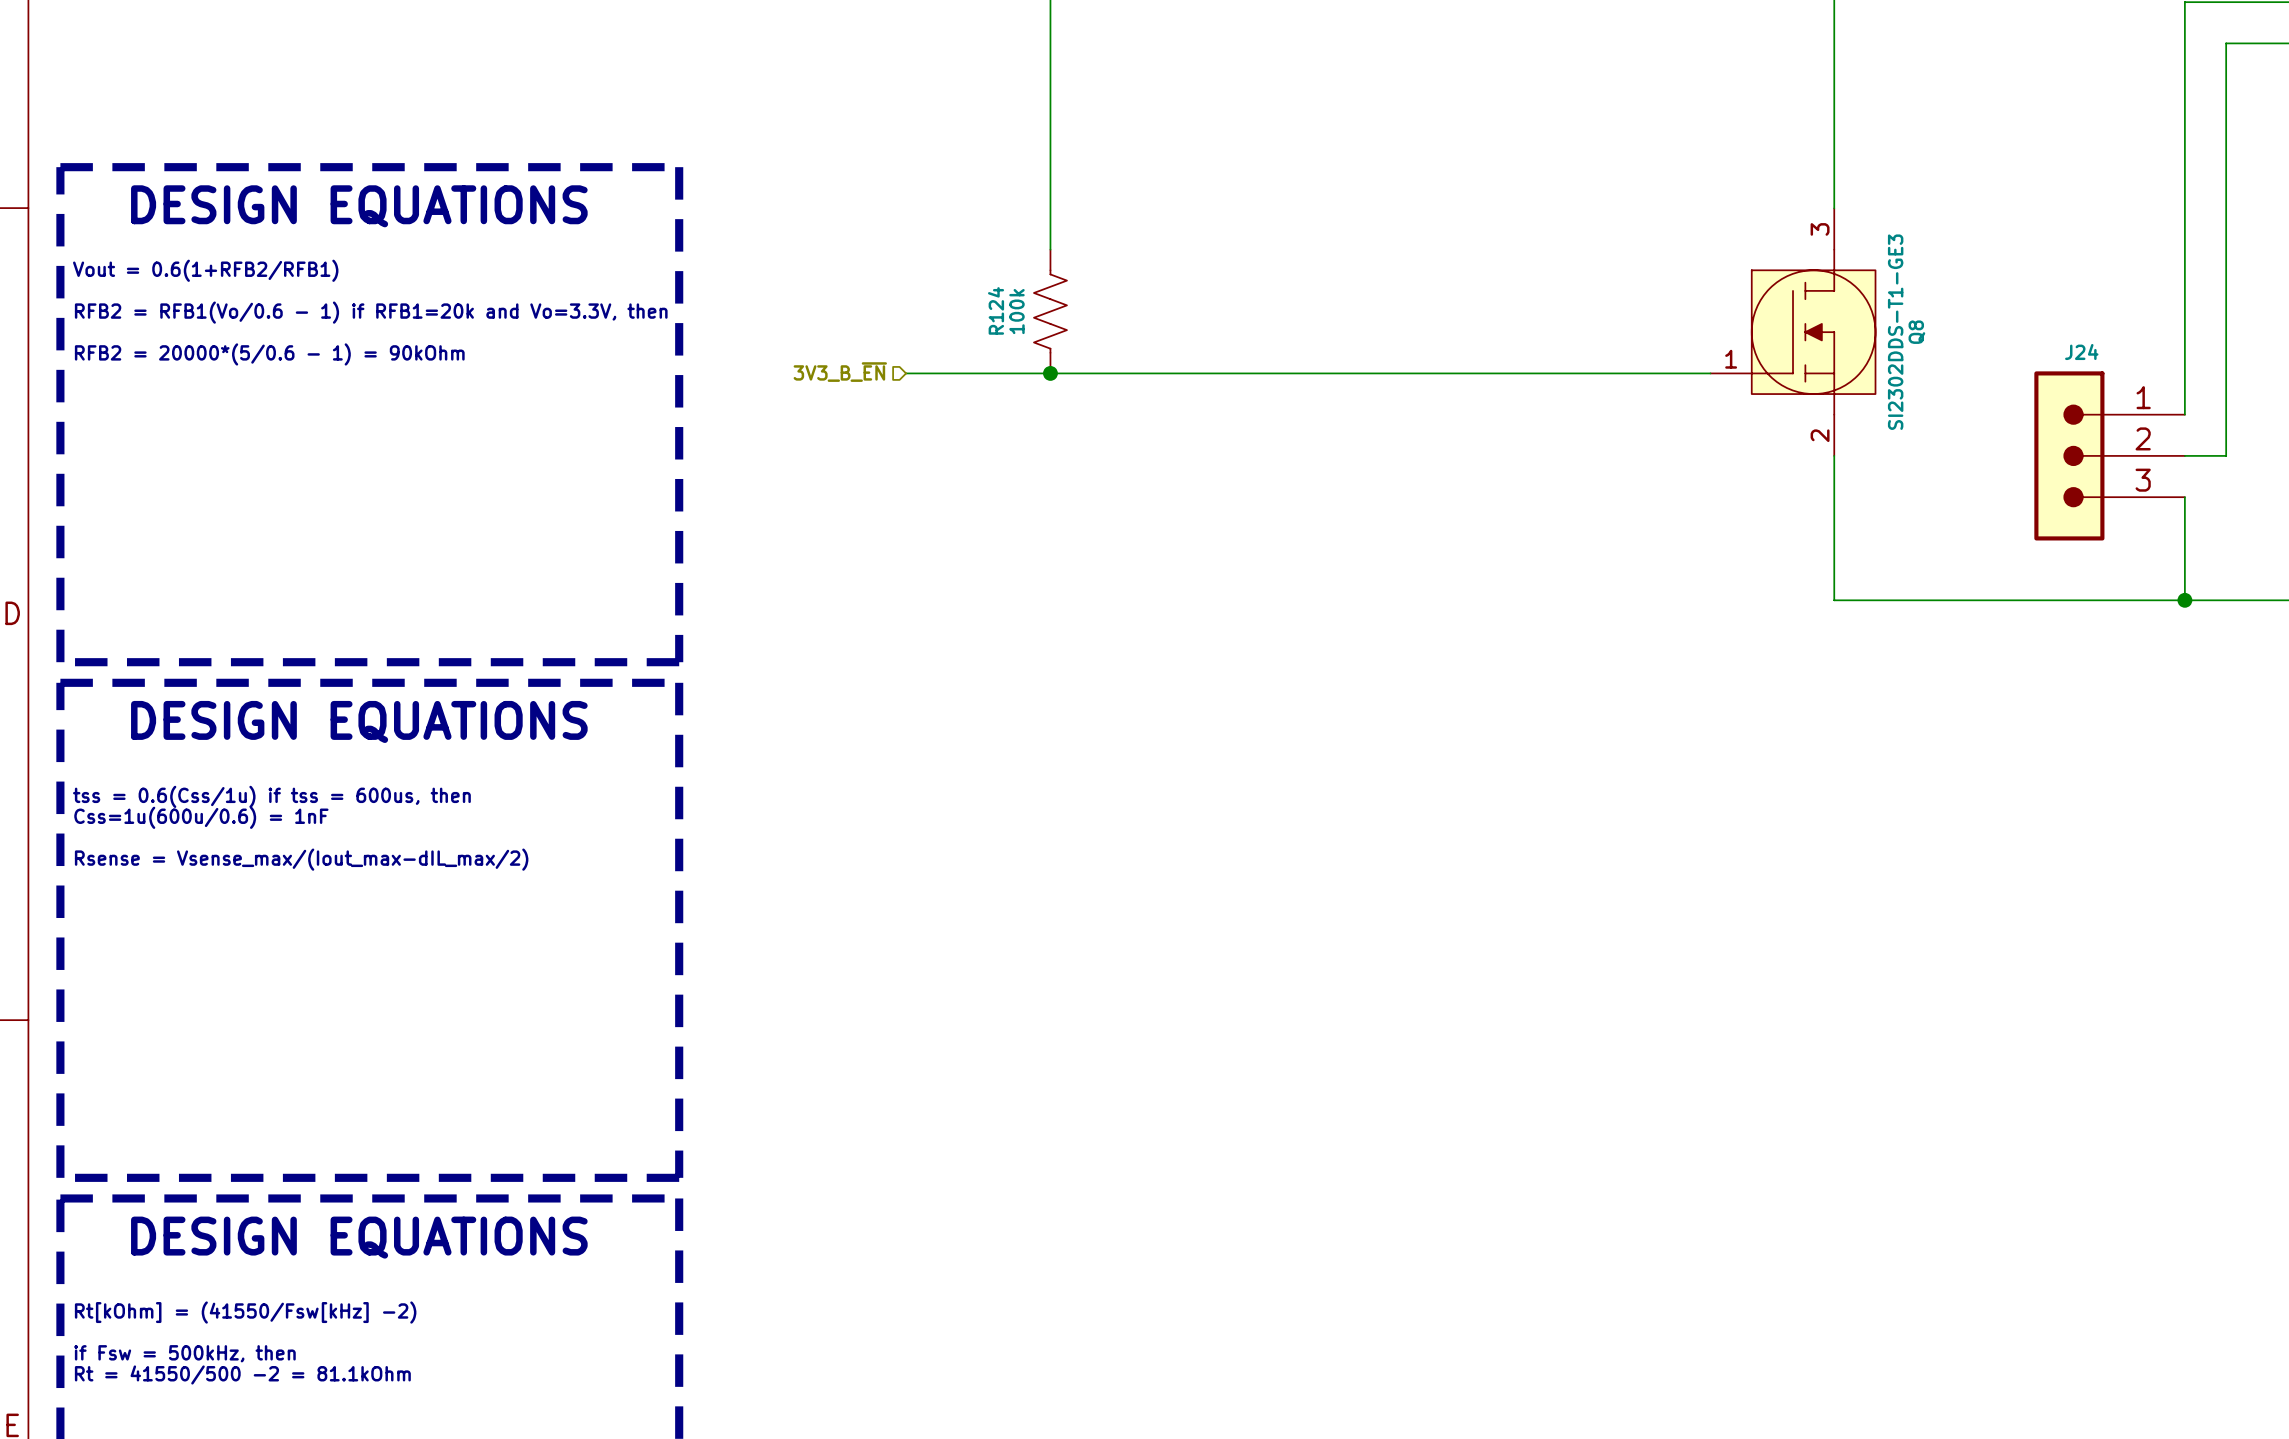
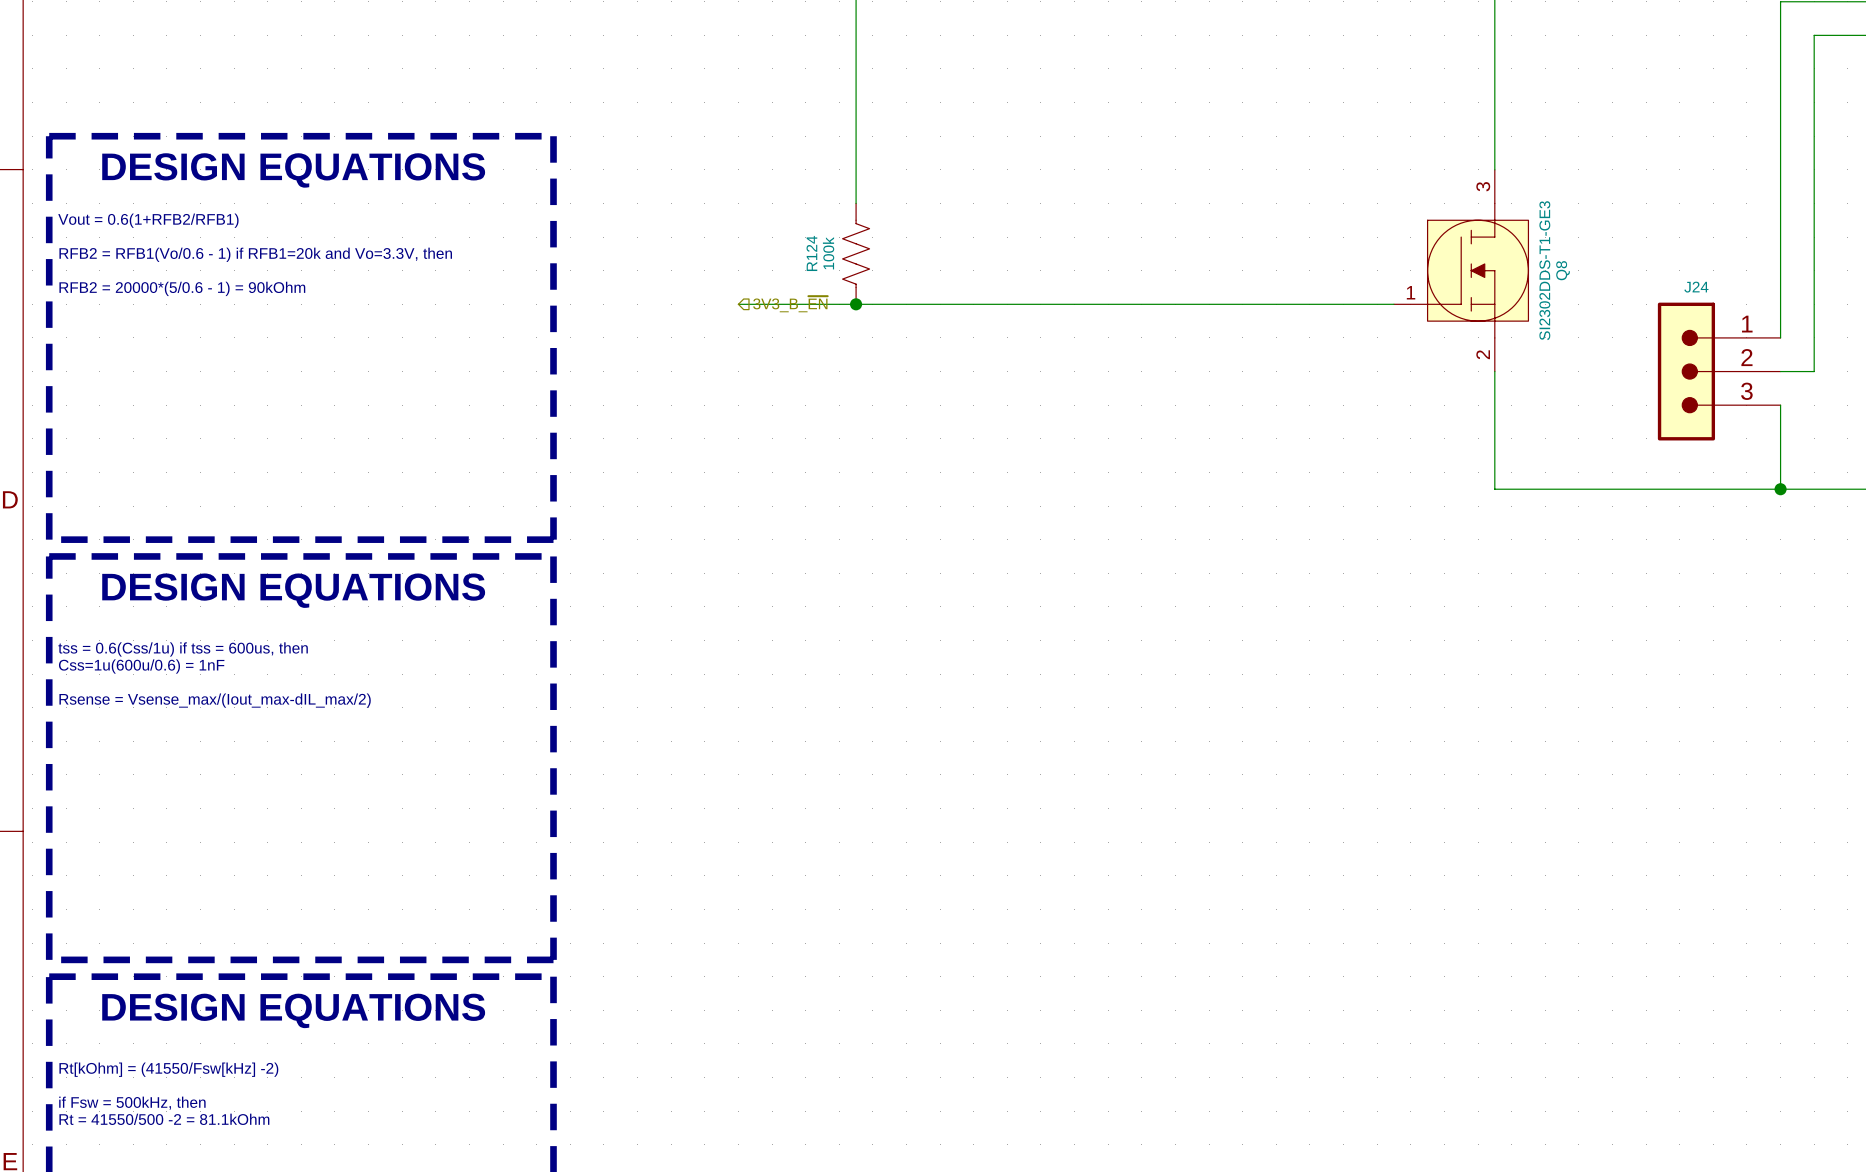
hierarchical label rotation: 0° (840, 372) -> 180° (790, 304)
hierarchical label position: 3V3_B_~{EN} (840, 372) -> 3V3_B_~{EN} (790, 304)

